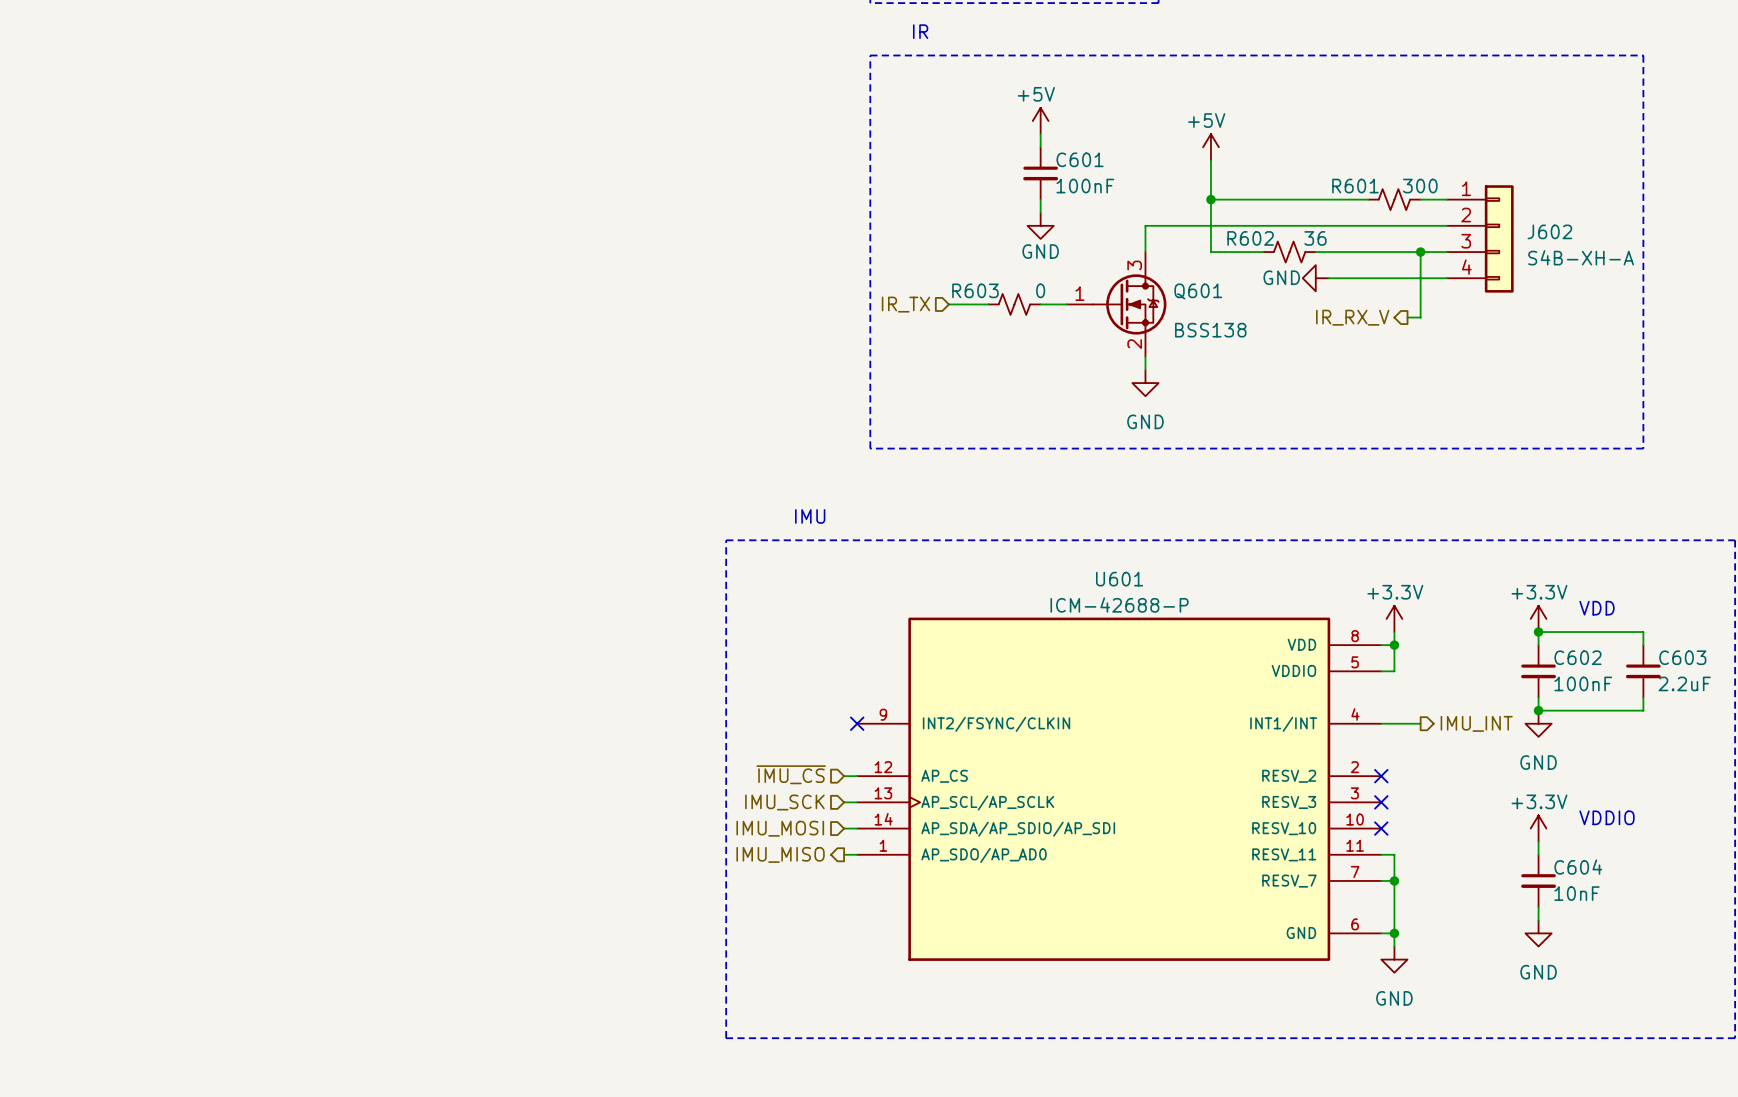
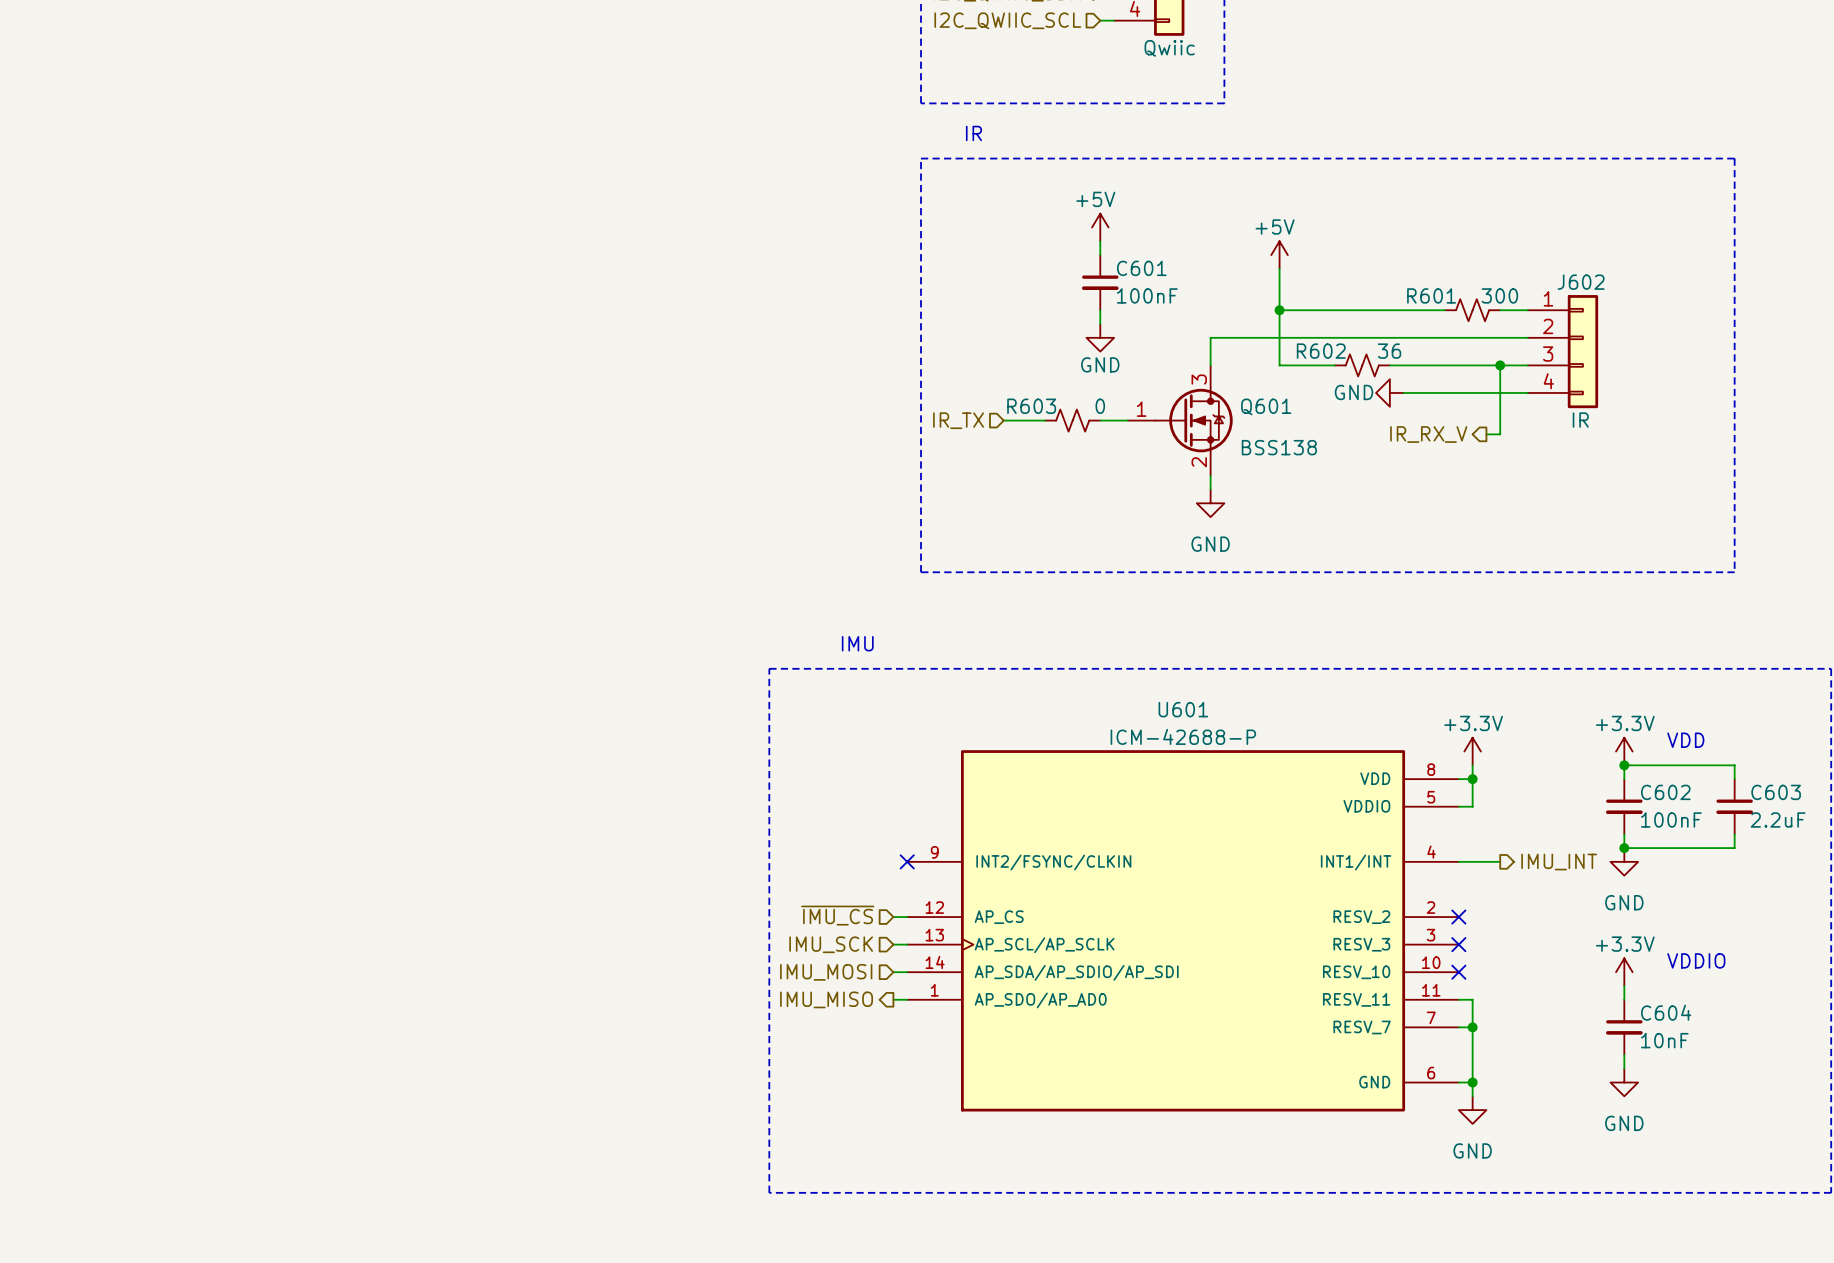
J602 name position: J602 (1549, 231) -> J602 (1581, 282)
J602 value: S4B-XH-A (1581, 257) -> IR (1580, 420)

